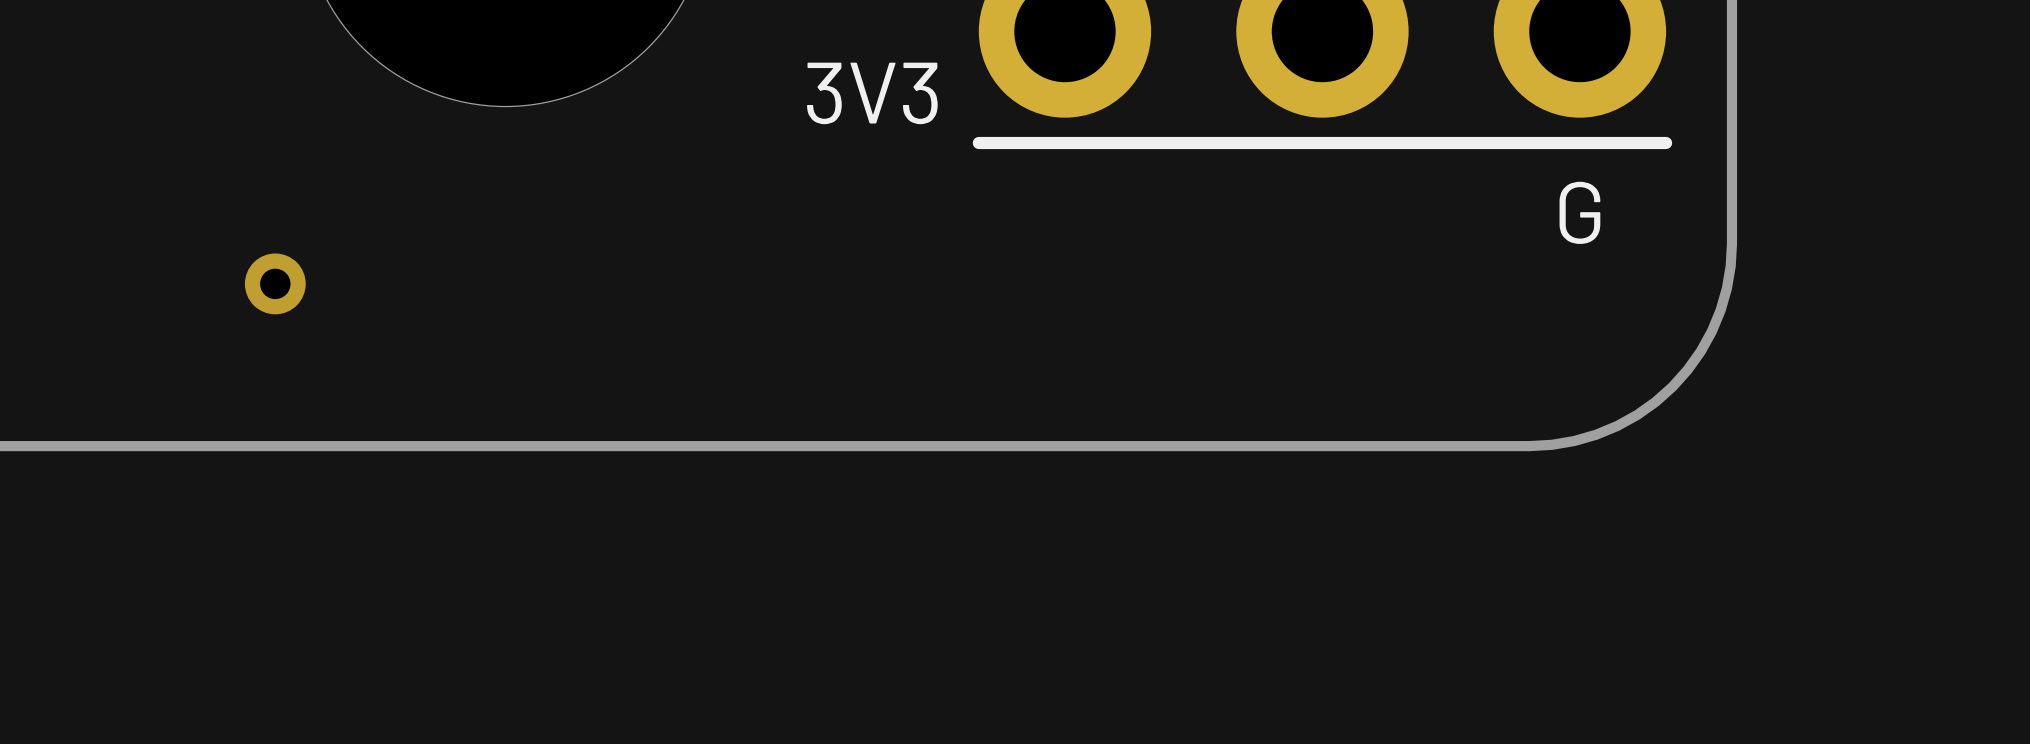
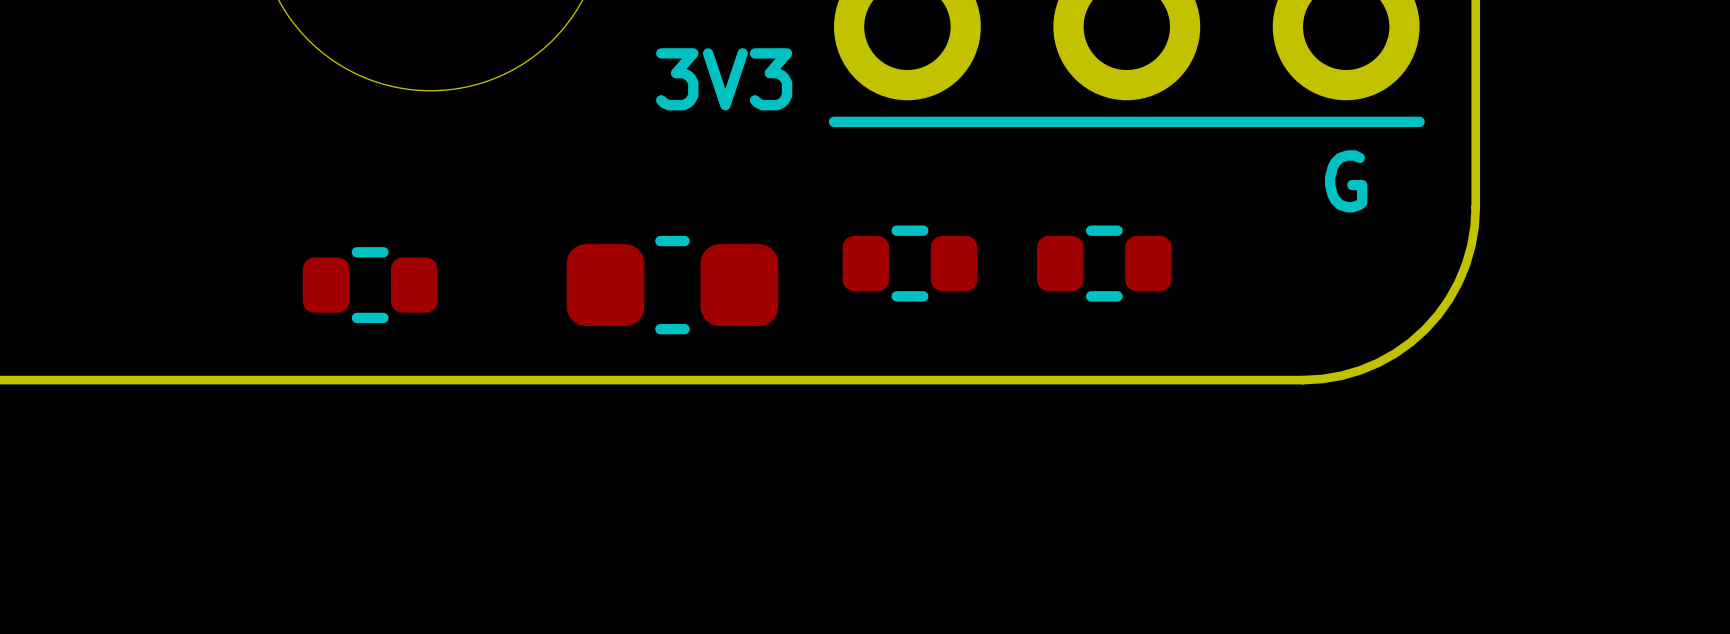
via: (275, 283) -> none
part: none -> (910, 263)
part: none -> (1104, 263)
part: none -> (370, 285)
part: none -> (672, 285)

